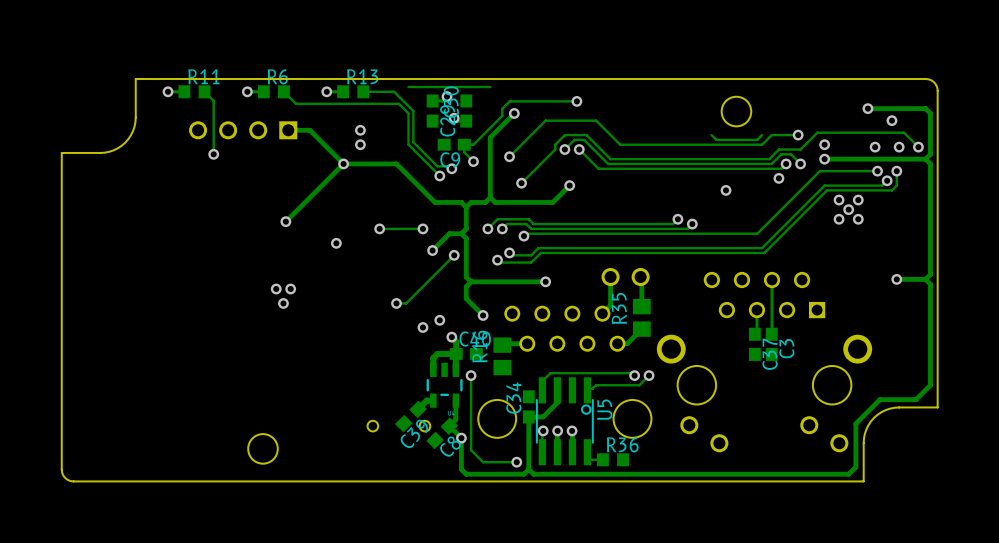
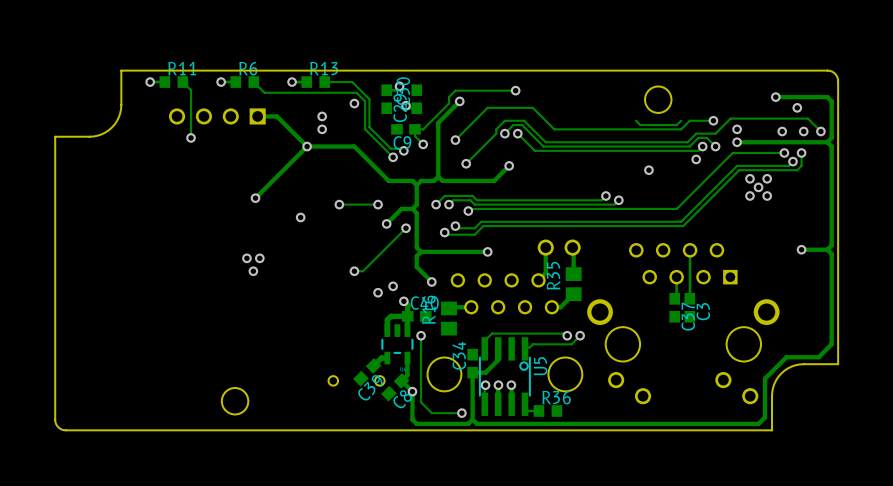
track: (490, 86) (408, 86) -> none
via: none -> (354, 103)

